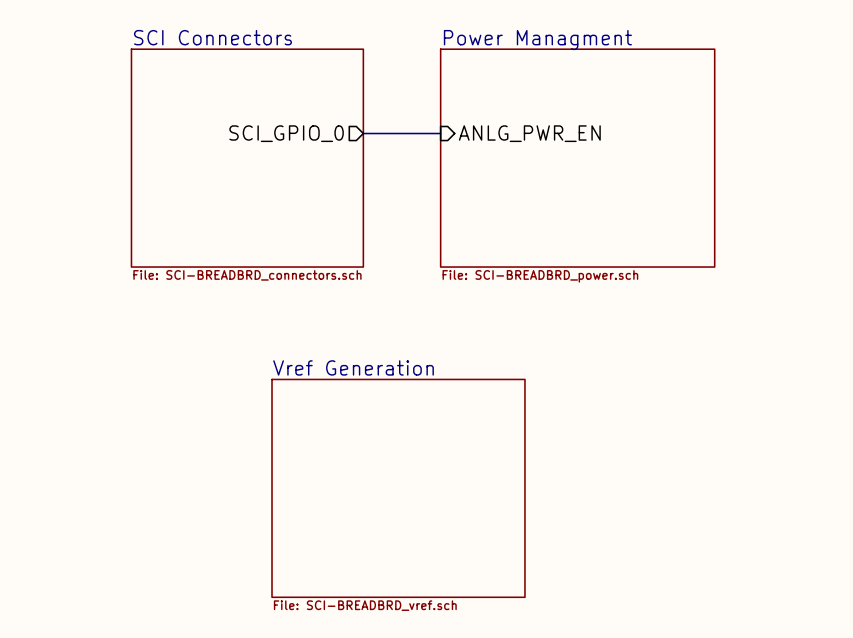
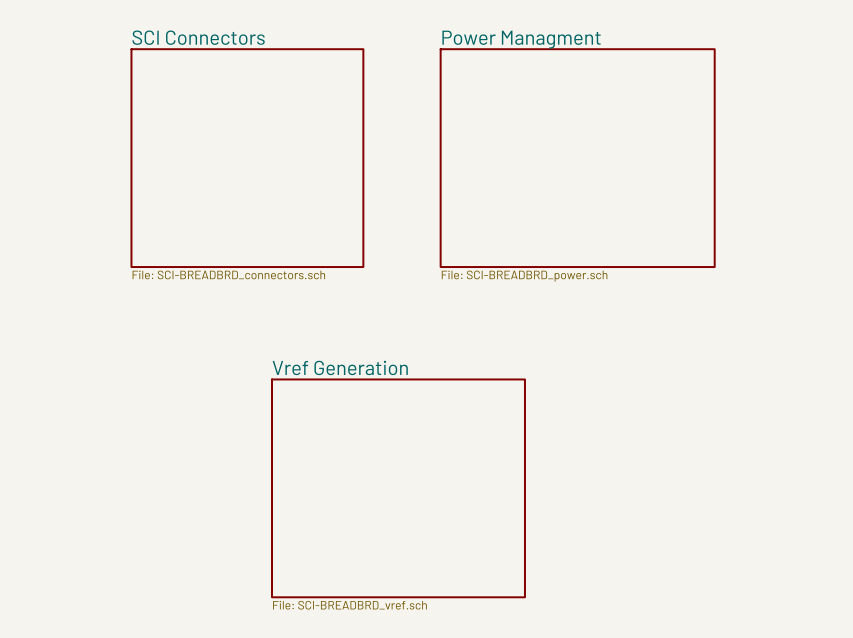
sheet pin: SCI_GPIO_0 (286, 133) -> none
wire: (363, 133) (440, 133) -> none
sheet pin: ANLG_PWR_EN (529, 133) -> none

